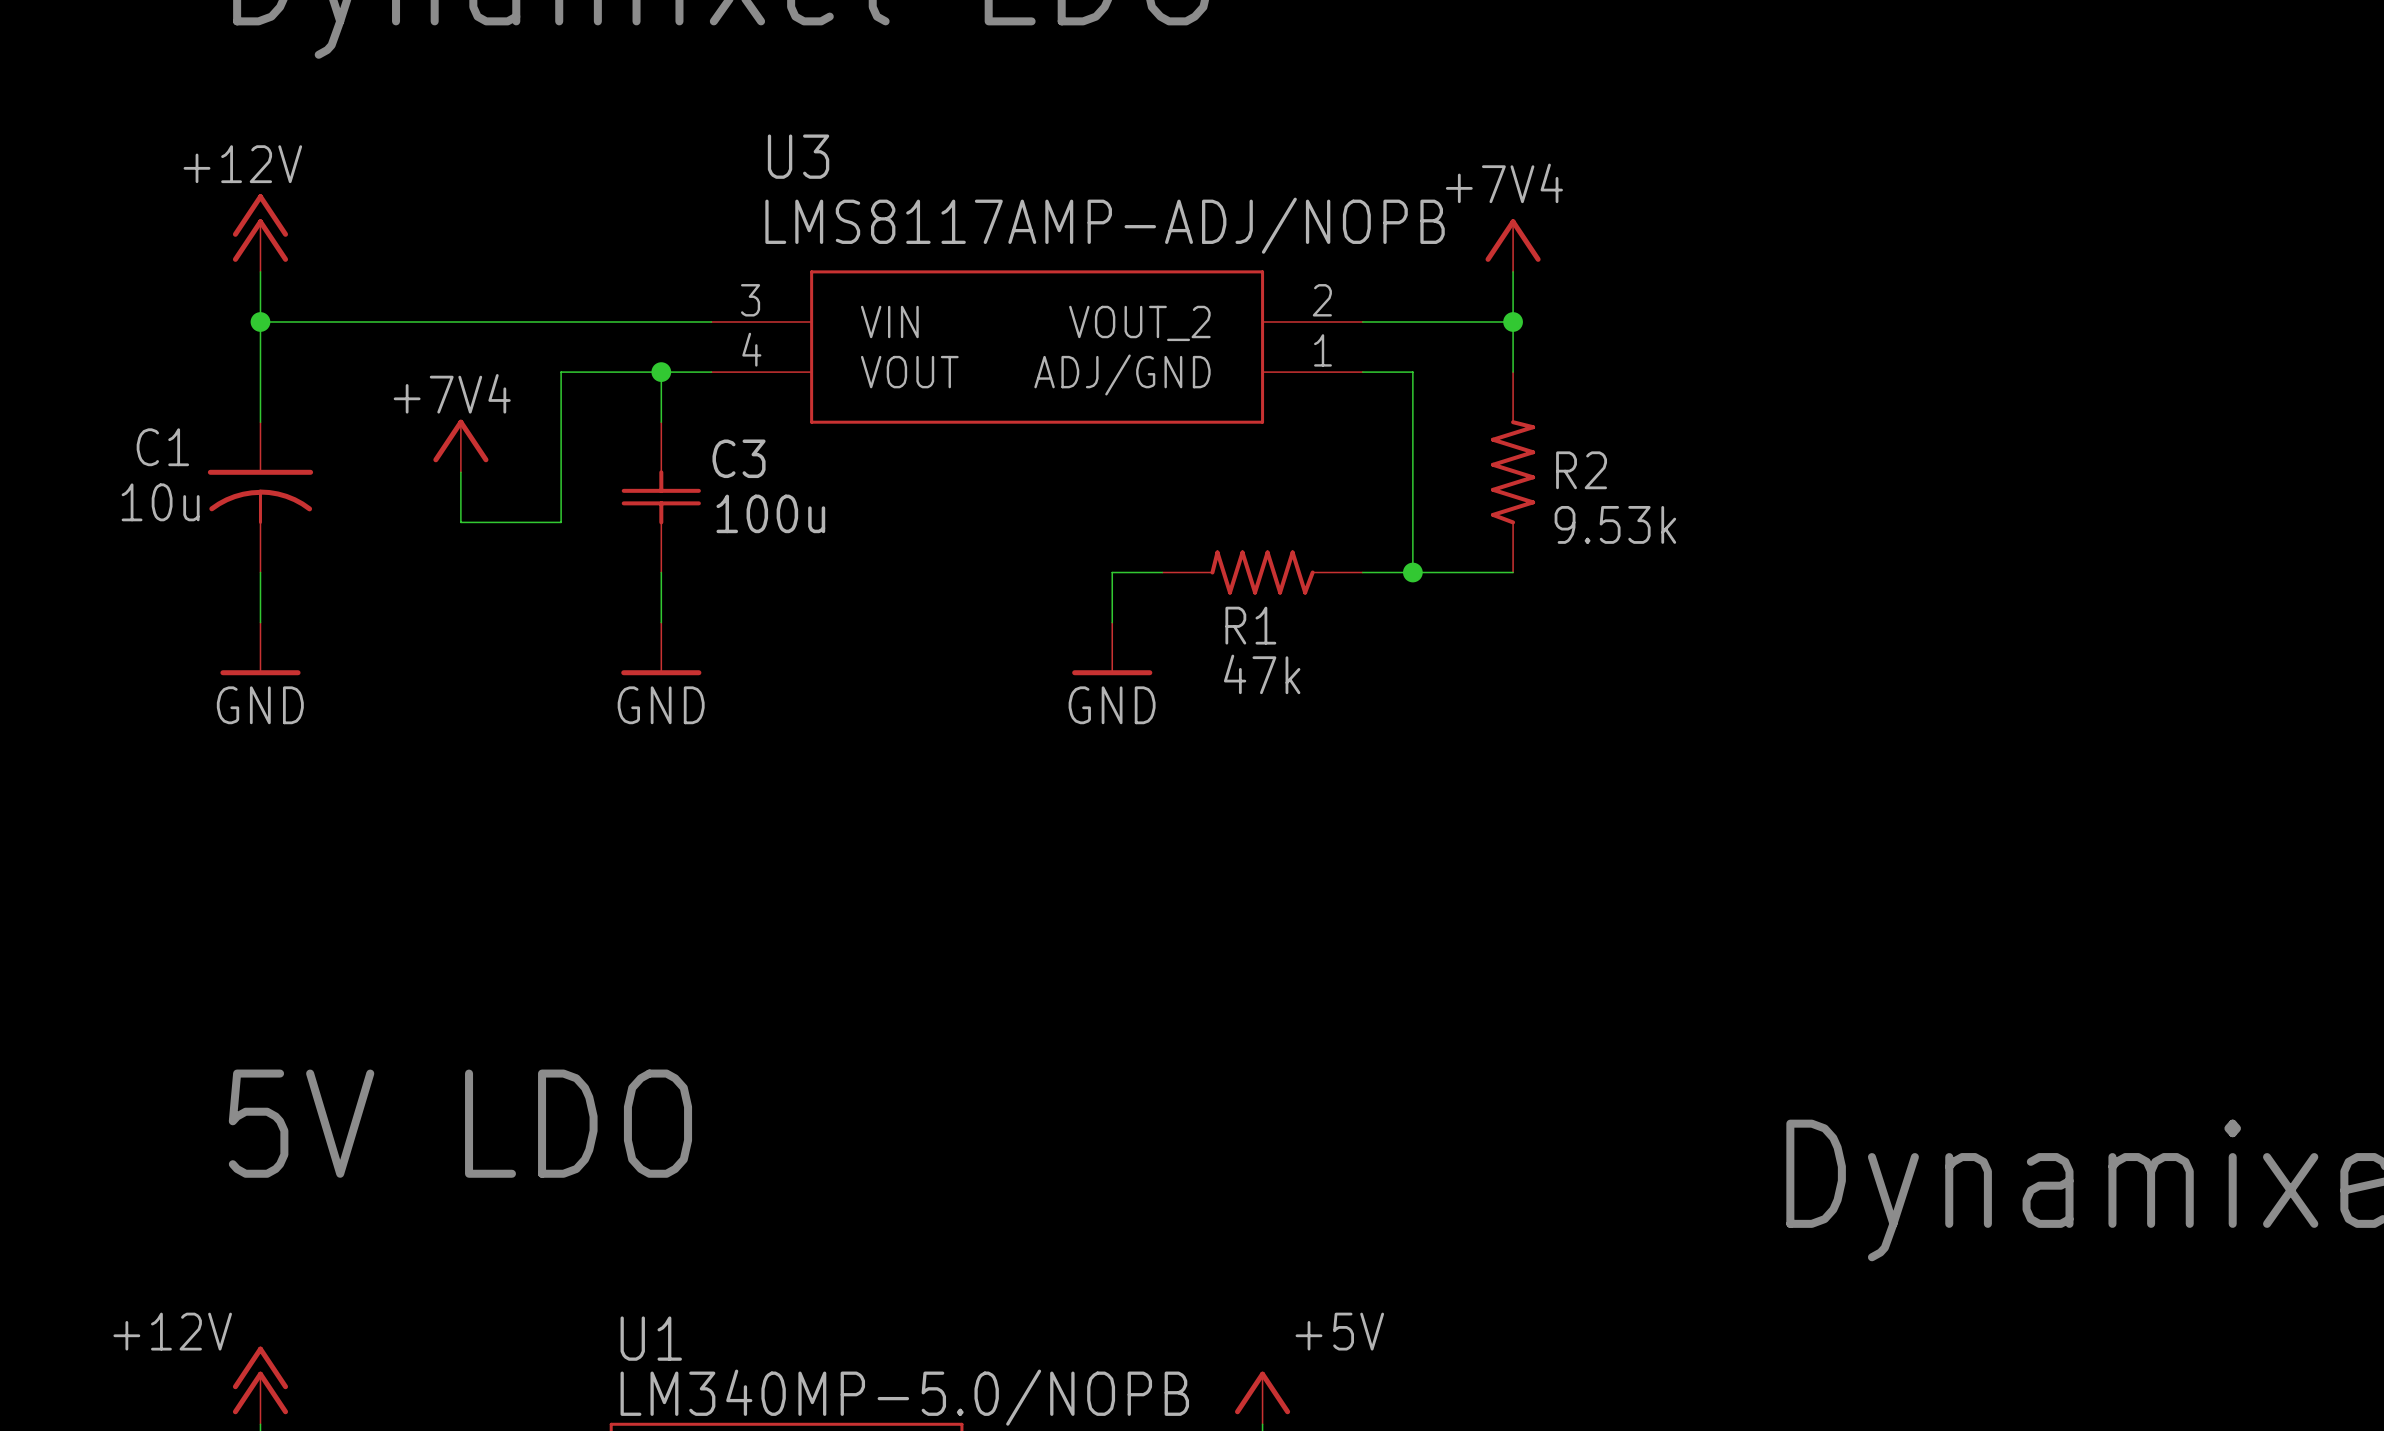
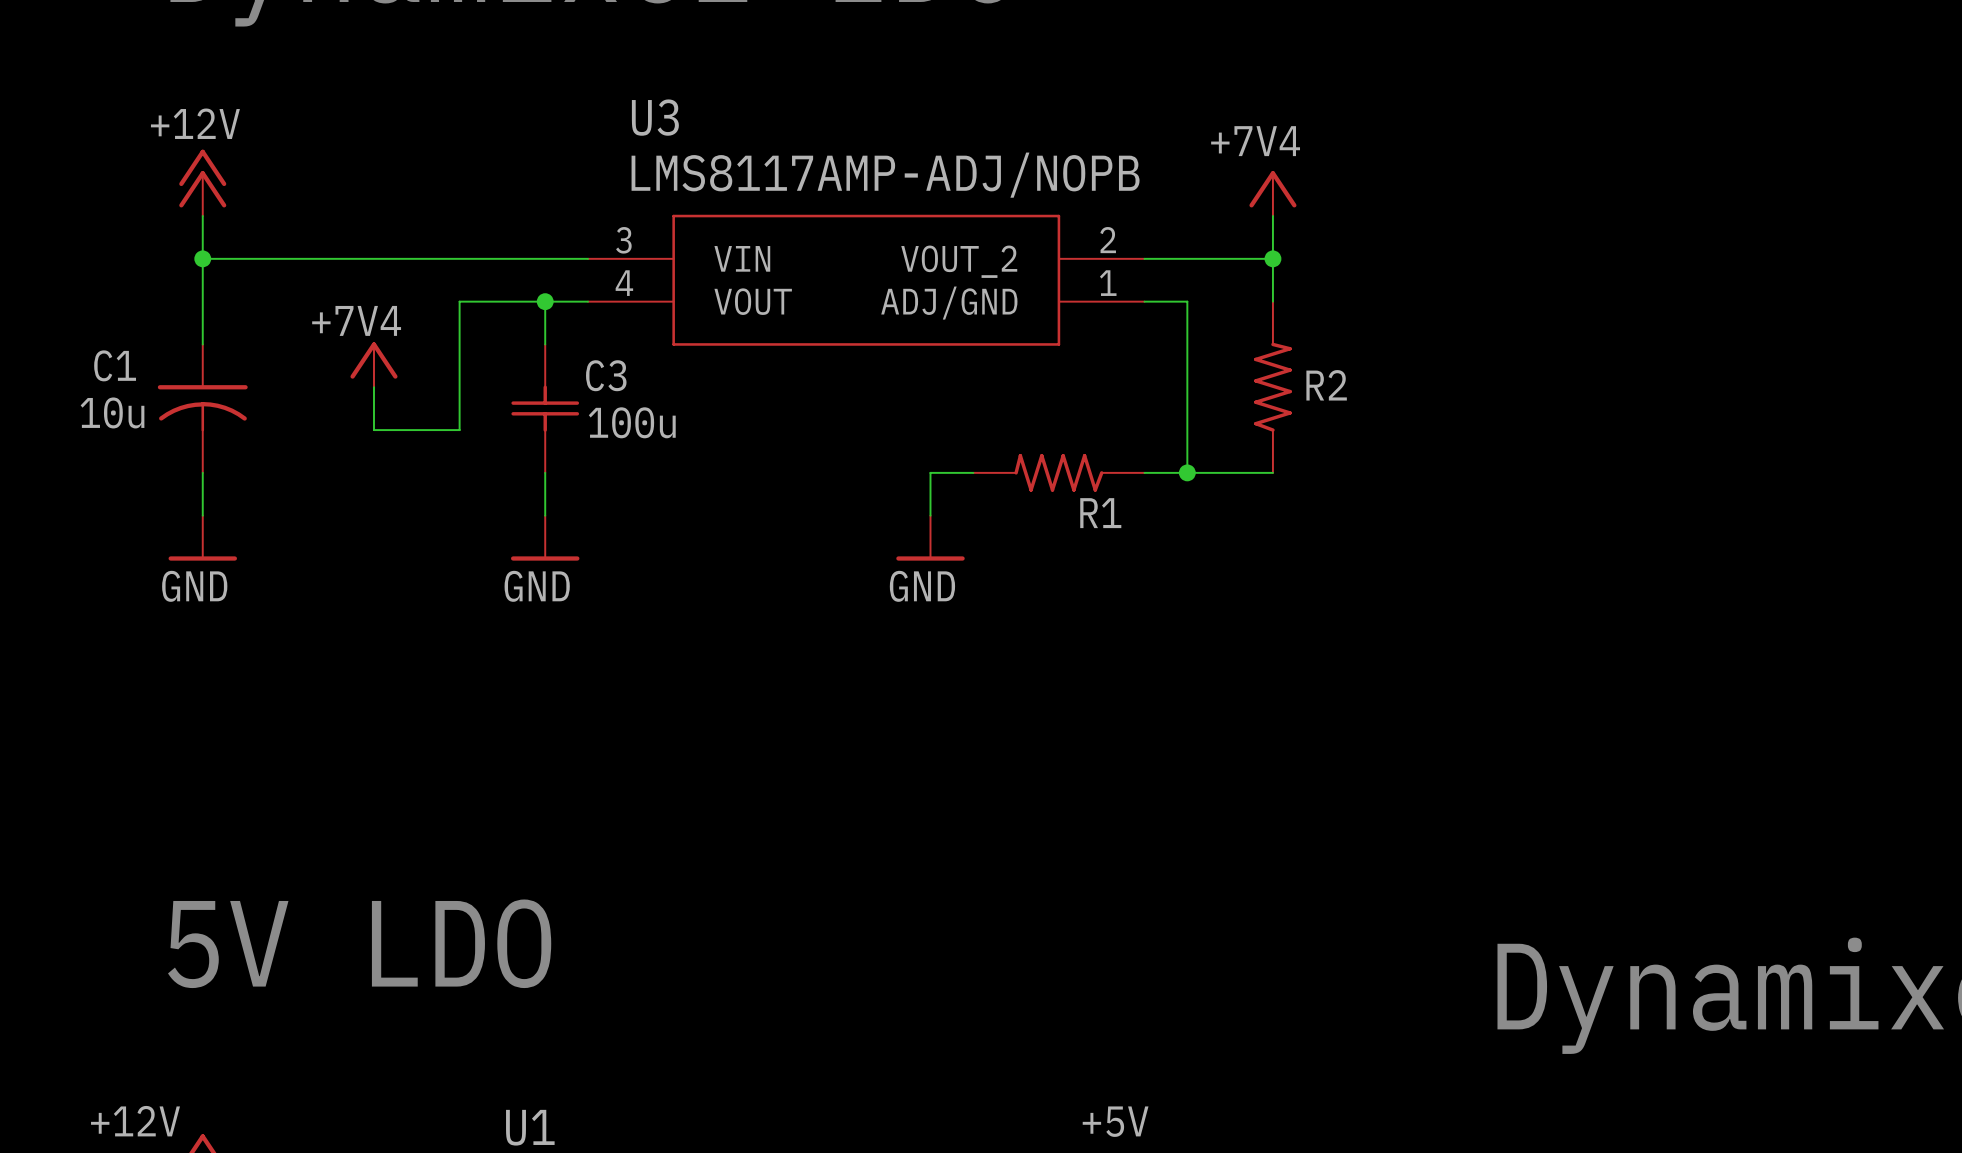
R2 value: 9.53k (1615, 524) -> none
R1 name position: R1 (1250, 625) -> R1 (1100, 513)
R1 value: 47k (1262, 674) -> none

